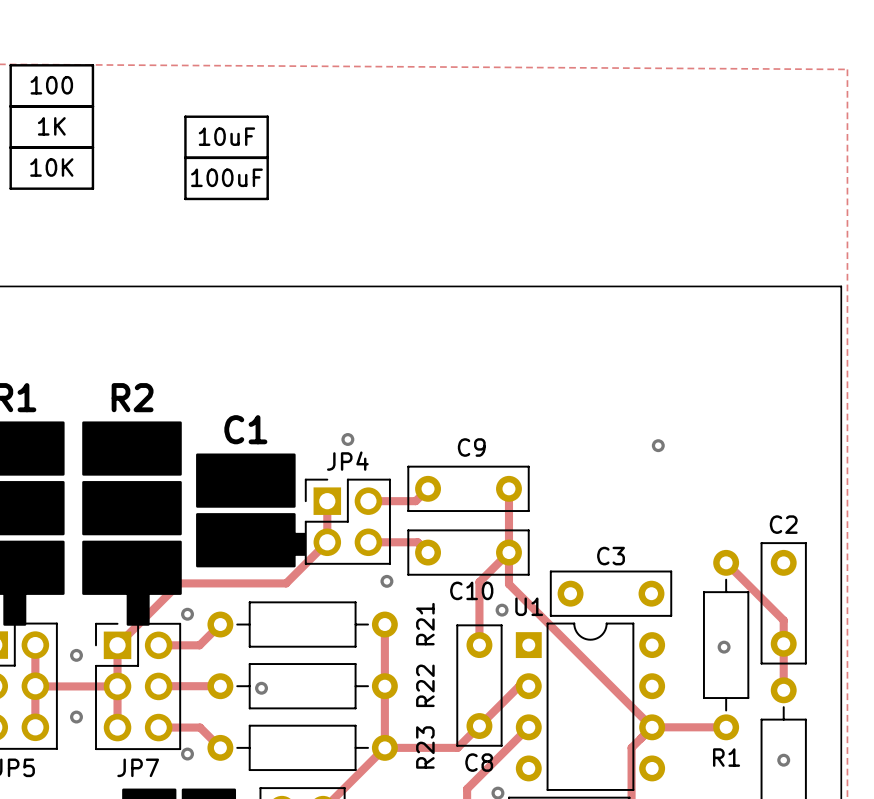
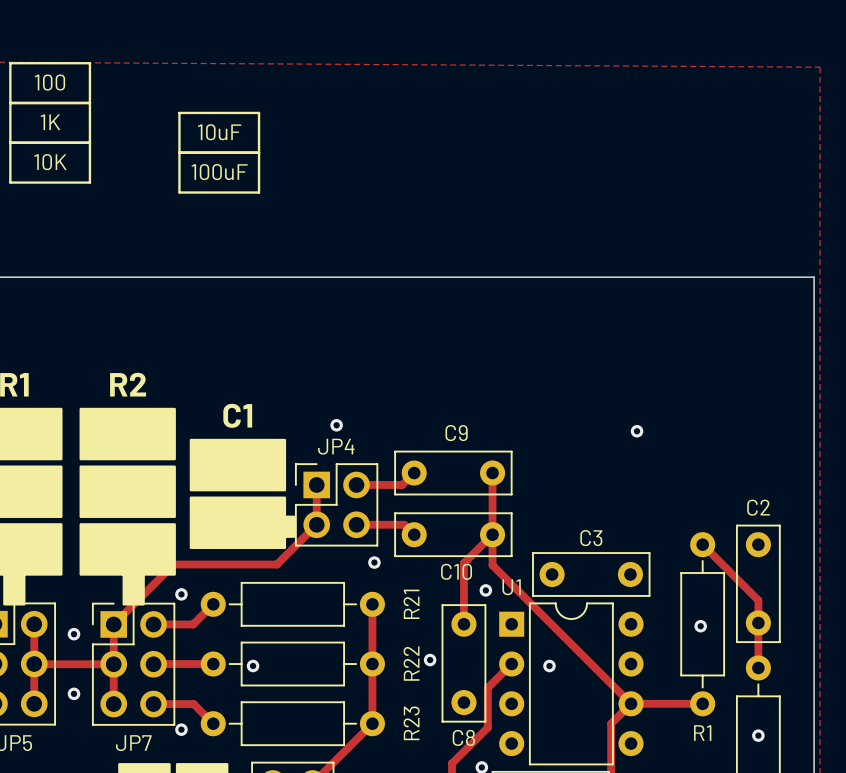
via: none -> (430, 660)
track: (528, 686) (519, 686) (457, 747) (384, 747) -> none
via: none -> (549, 666)
track: (528, 727) (504, 751) -> (511, 664) (487, 687) (487, 727)

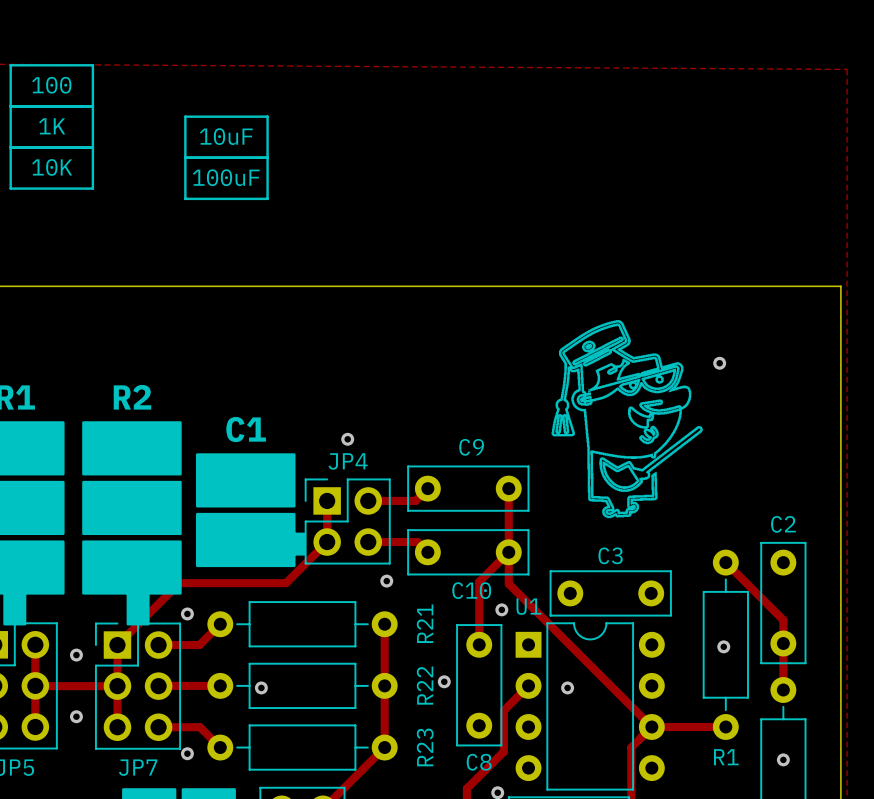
drawing: none -> [551, 320, 703, 519]
via: none -> (719, 363)
via: (637, 431) -> none

